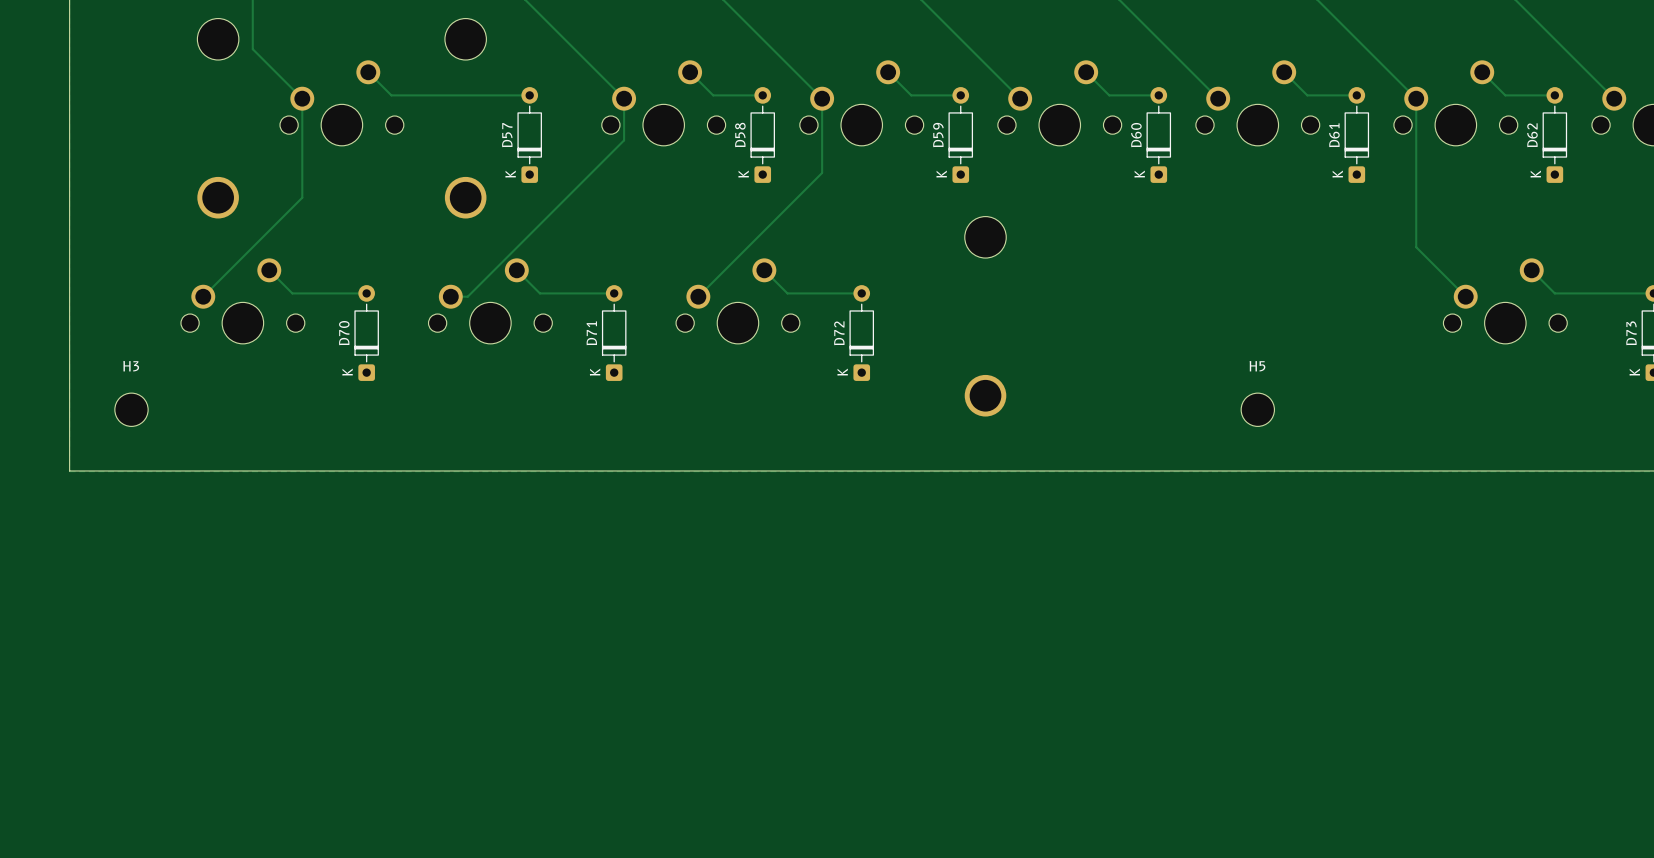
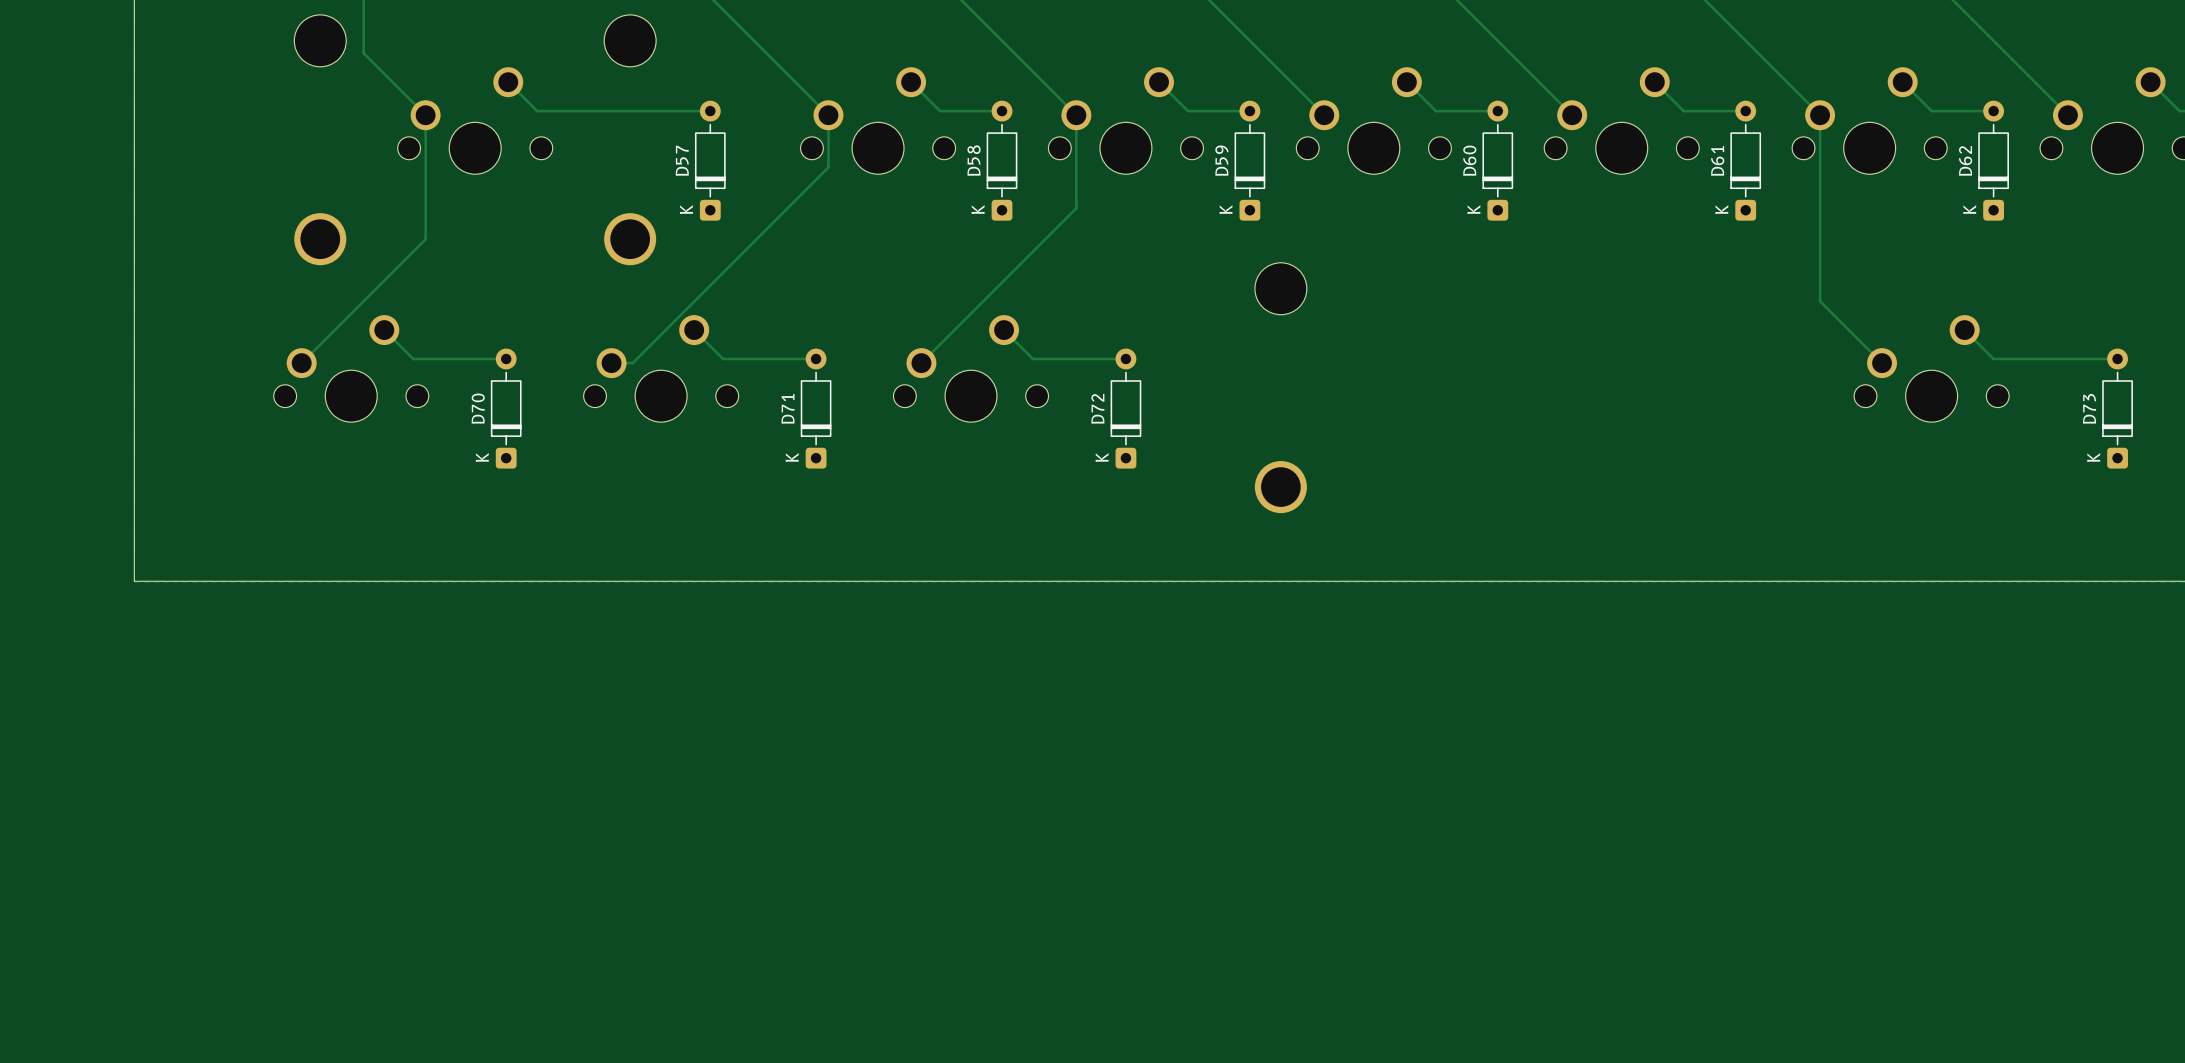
H3: (131, 409) -> none
H5: (1257, 409) -> none

